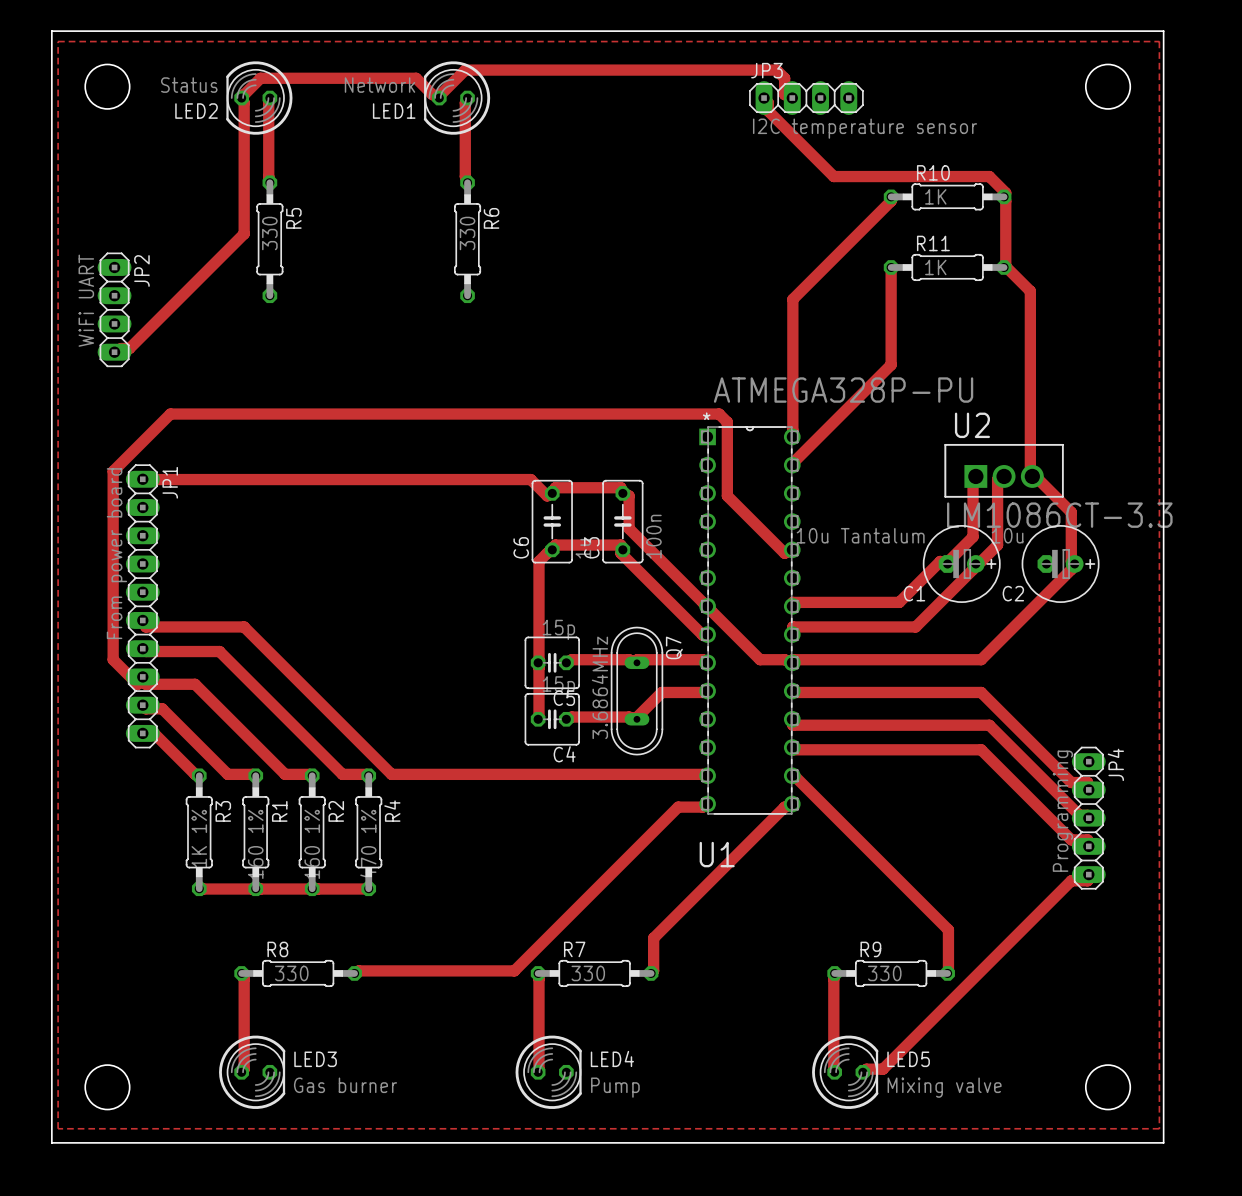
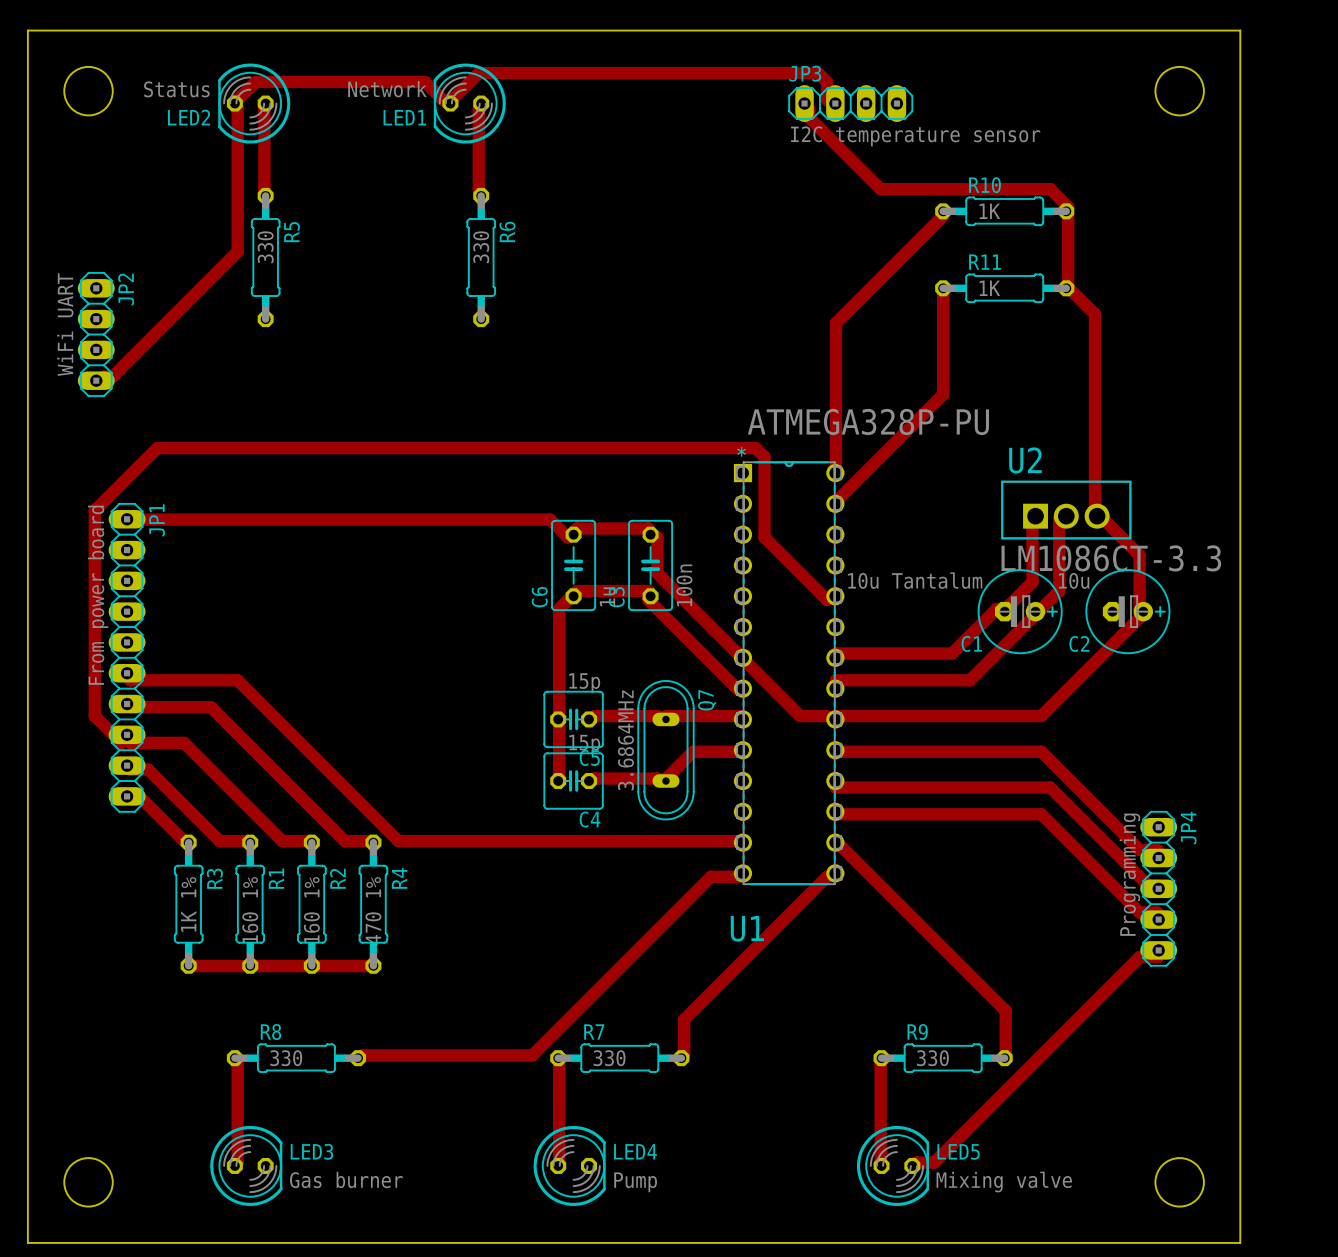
zone outline: (58, 41) (1159, 41) (1159, 1128) (58, 1128) (58, 41) -> none

